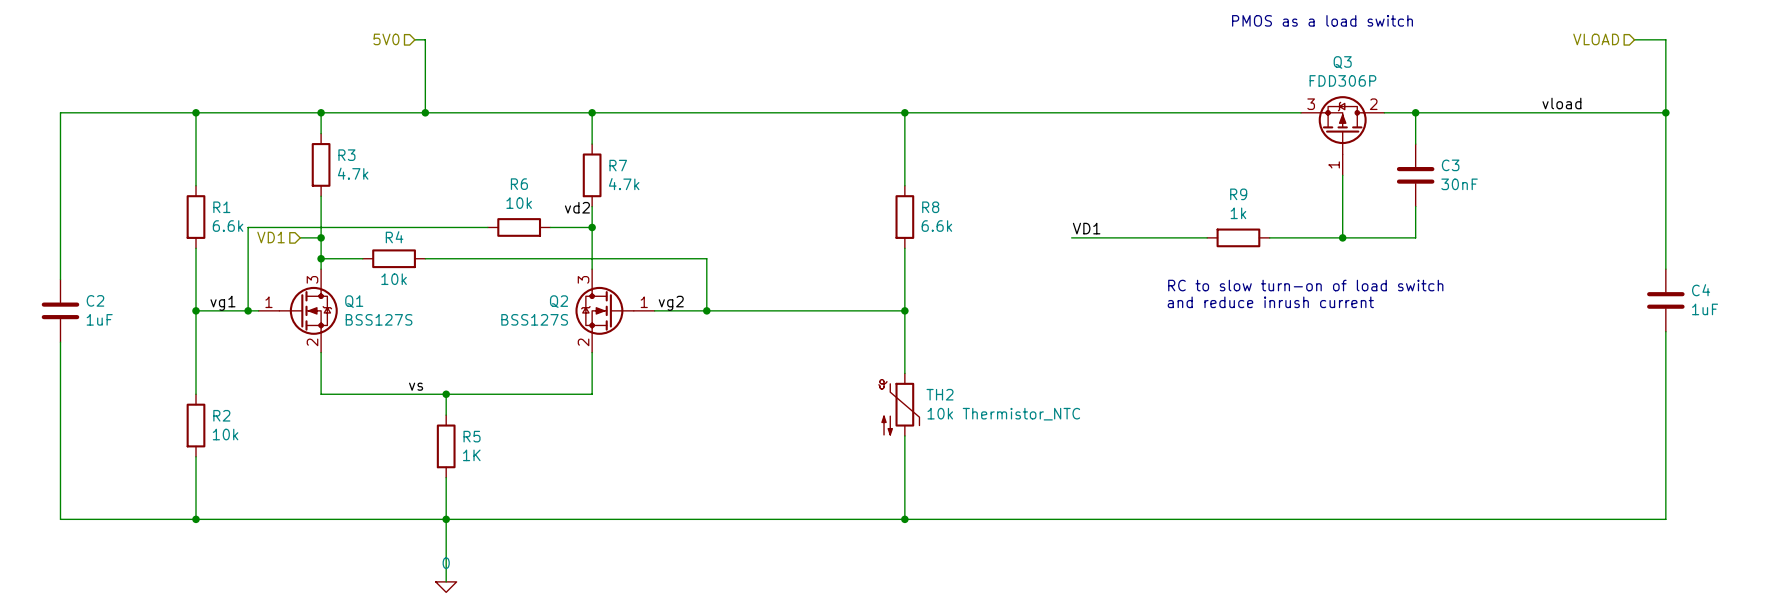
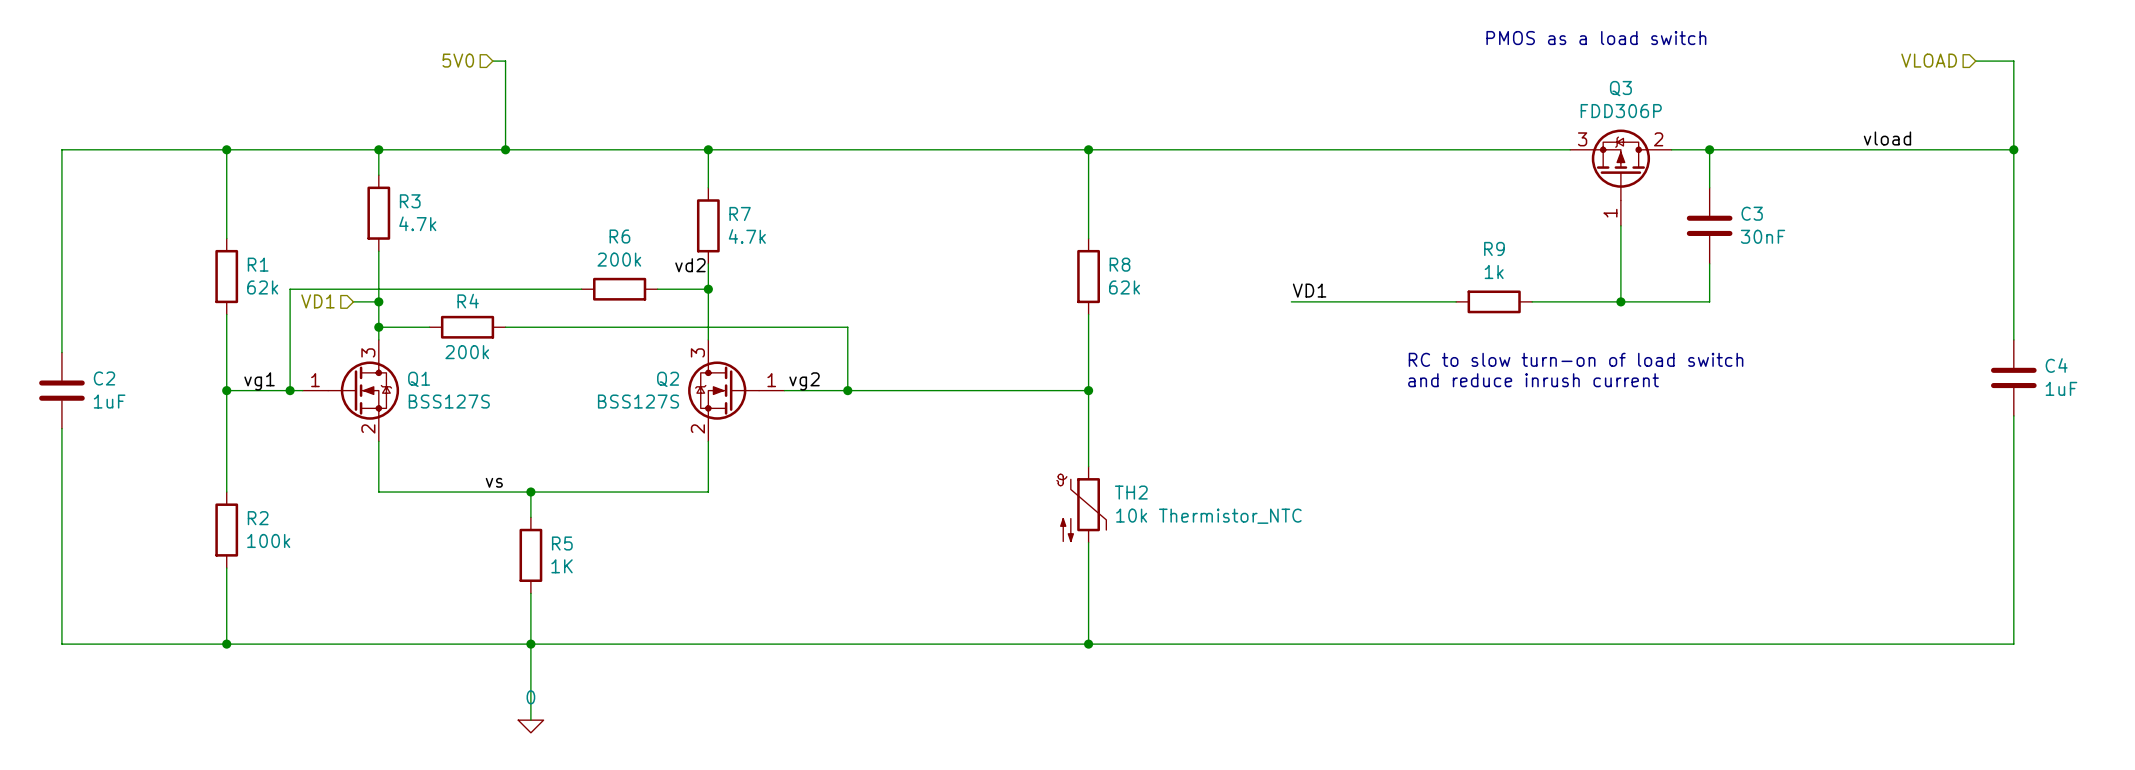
R6 value: 10k (519, 203) -> 200k (619, 259)
R1 value: 6.6k (228, 226) -> 62k (262, 287)
R8 value: 6.6k (936, 226) -> 62k (1124, 287)
R4 value: 10k (394, 279) -> 200k (467, 352)
R2 value: 10k (225, 434) -> 100k (268, 540)

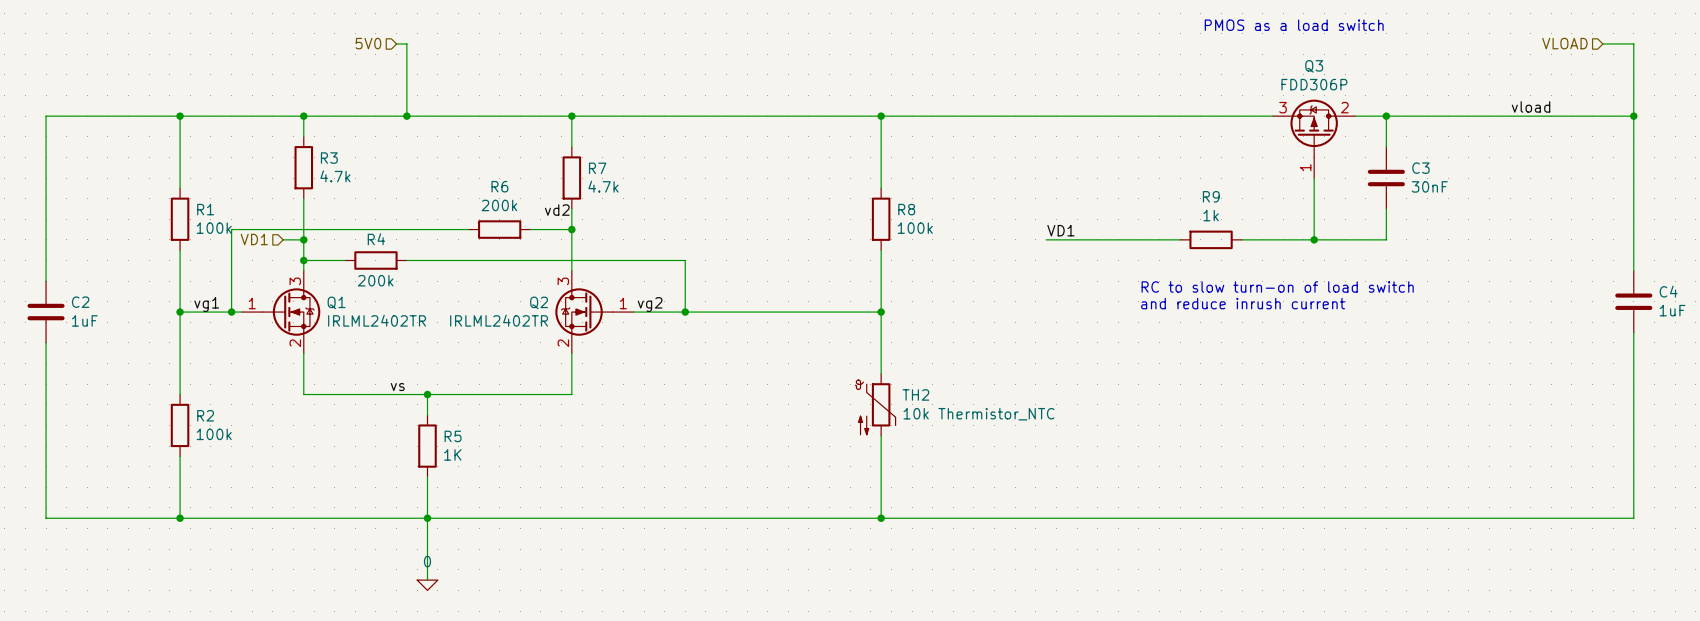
R1 value: 62k (262, 287) -> 100k (214, 228)
R8 value: 62k (1124, 287) -> 100k (915, 228)
Q1 value: BSS127S (449, 401) -> IRLML2402TR (377, 320)
Q2 value: BSS127S (638, 401) -> IRLML2402TR (499, 320)

